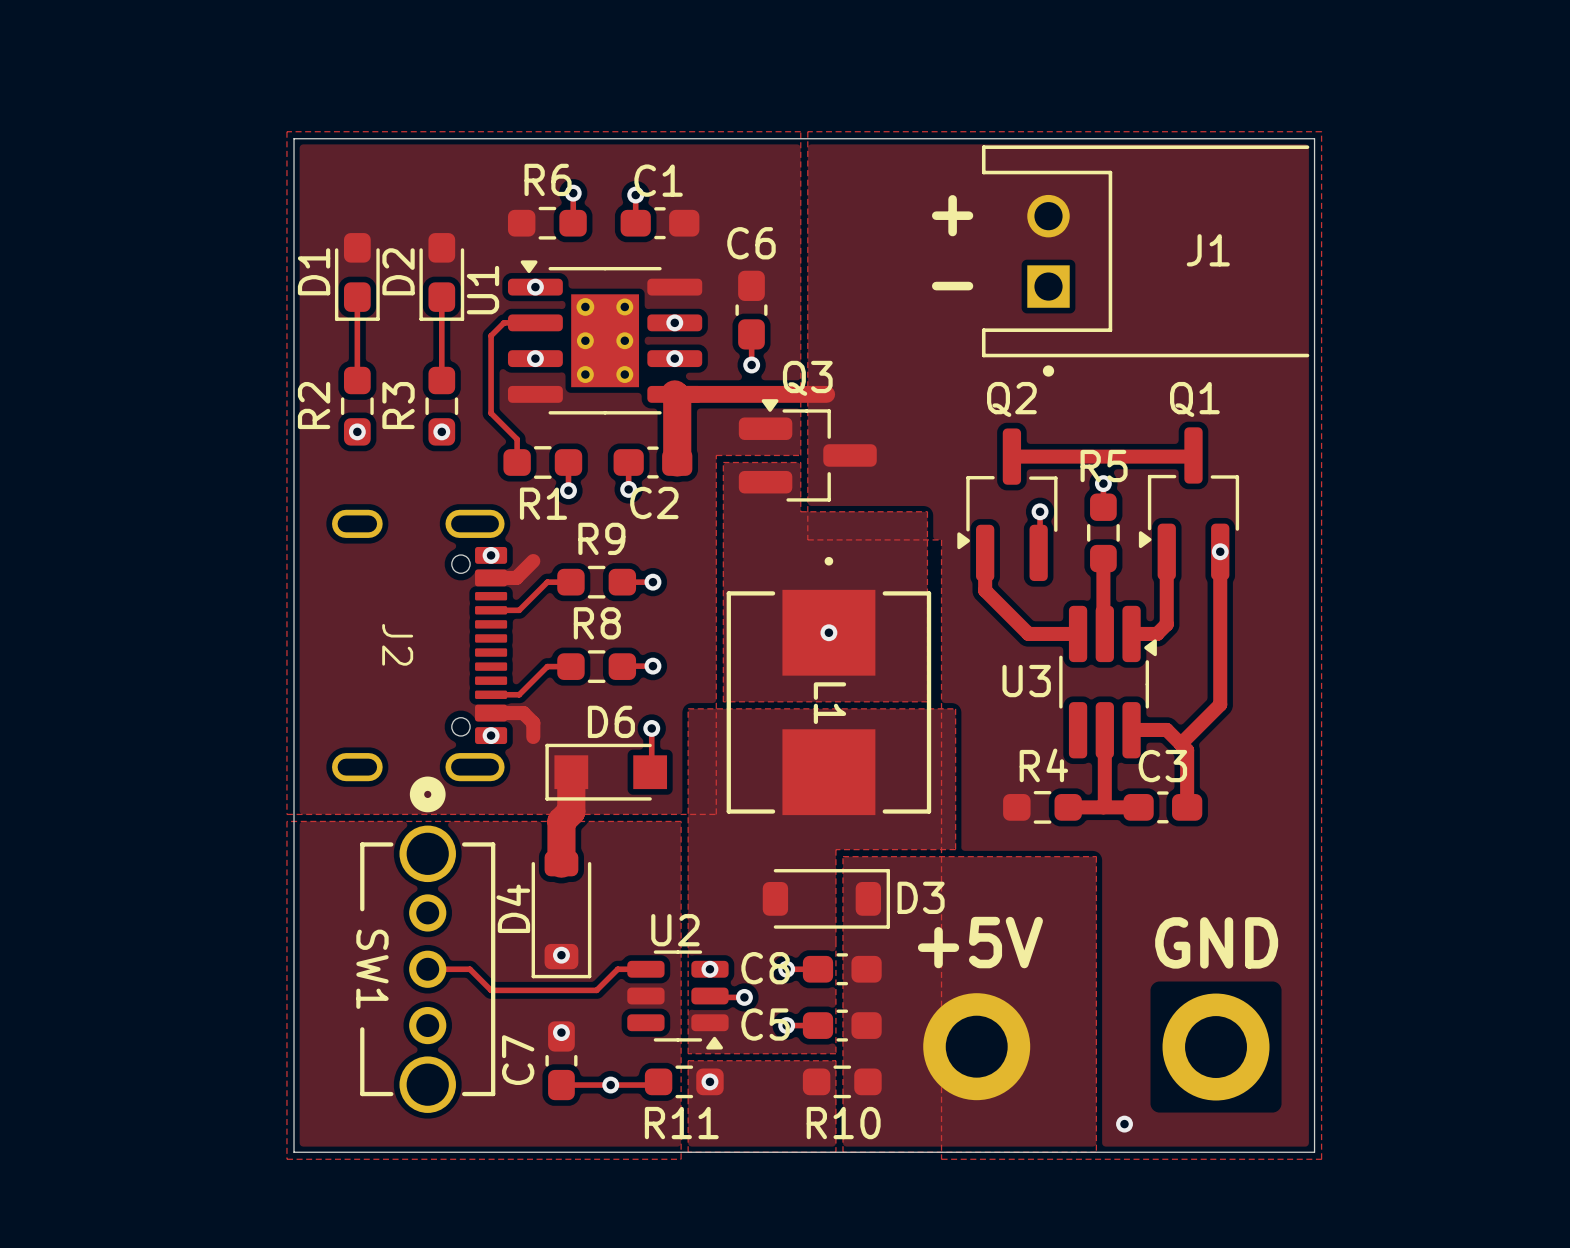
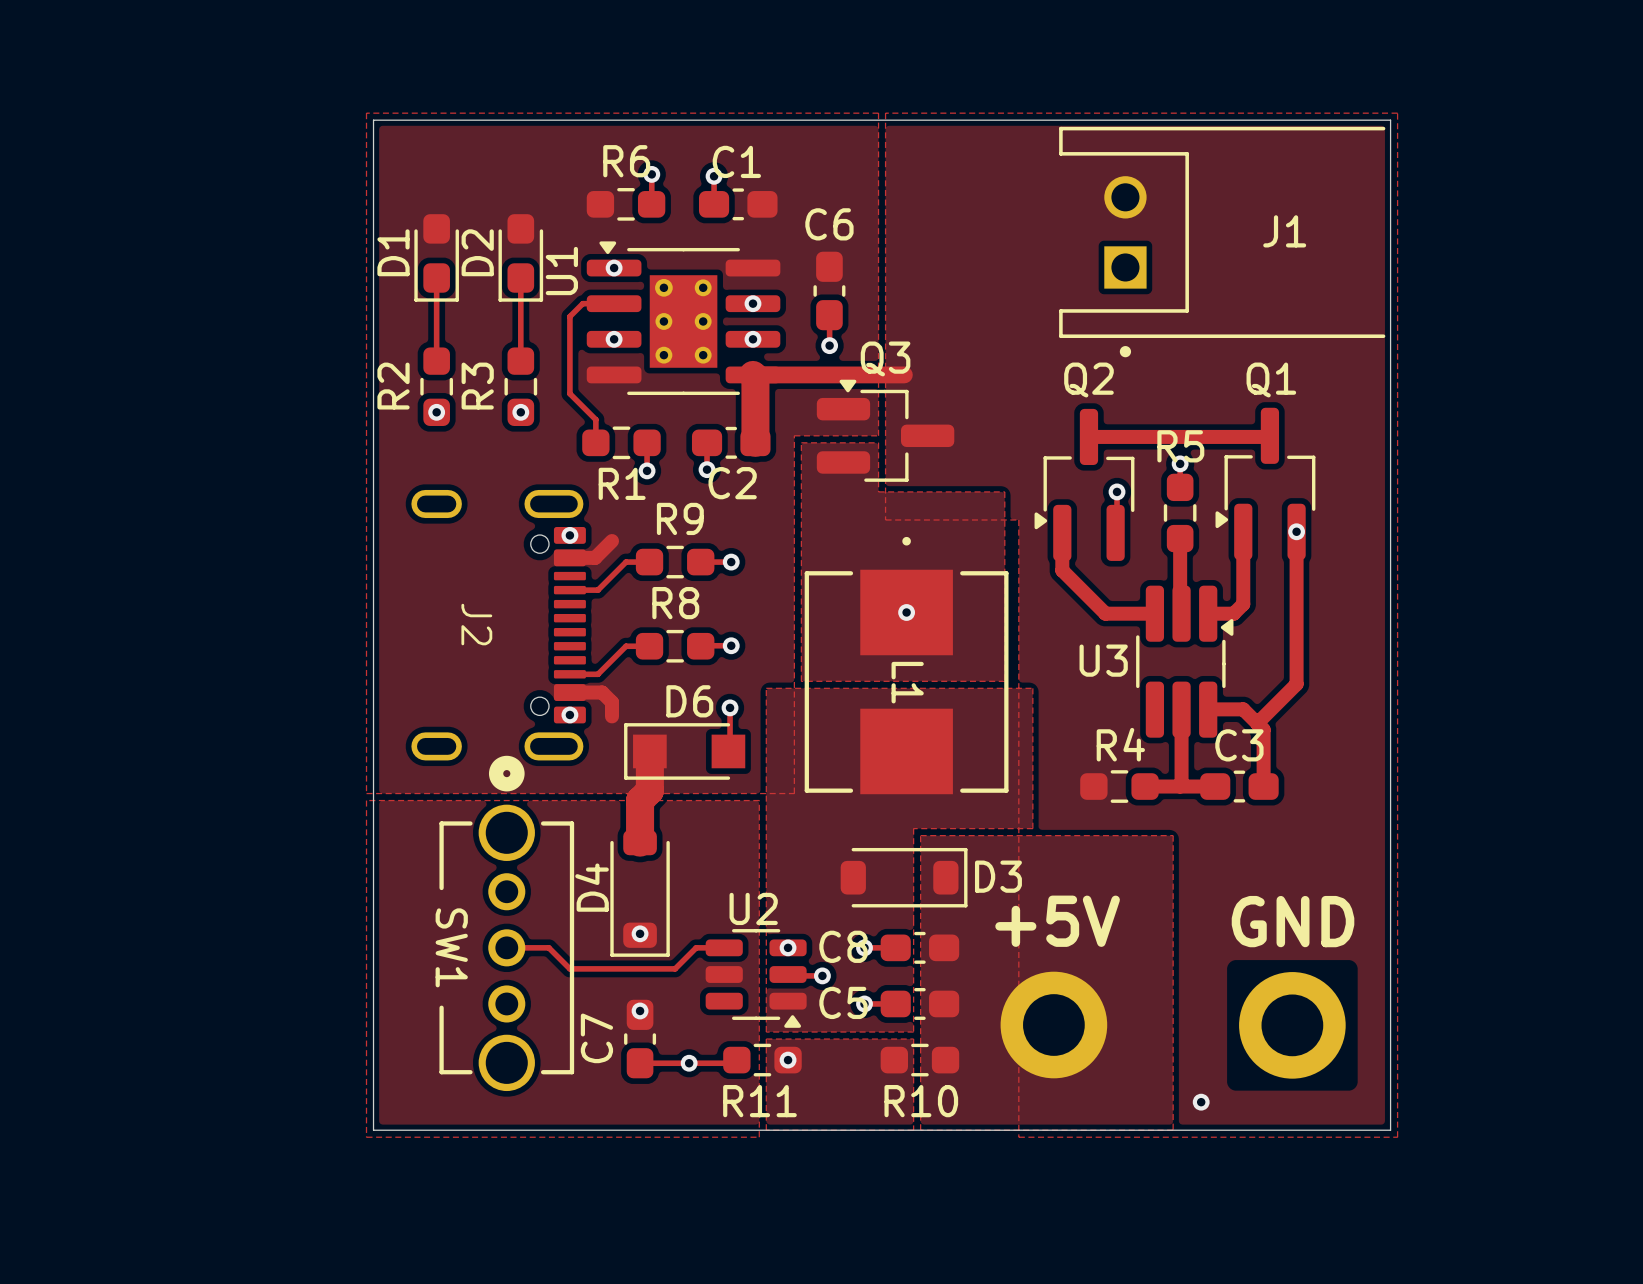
text: + (952, 215) -> none
text: - (952, 286) -> none

